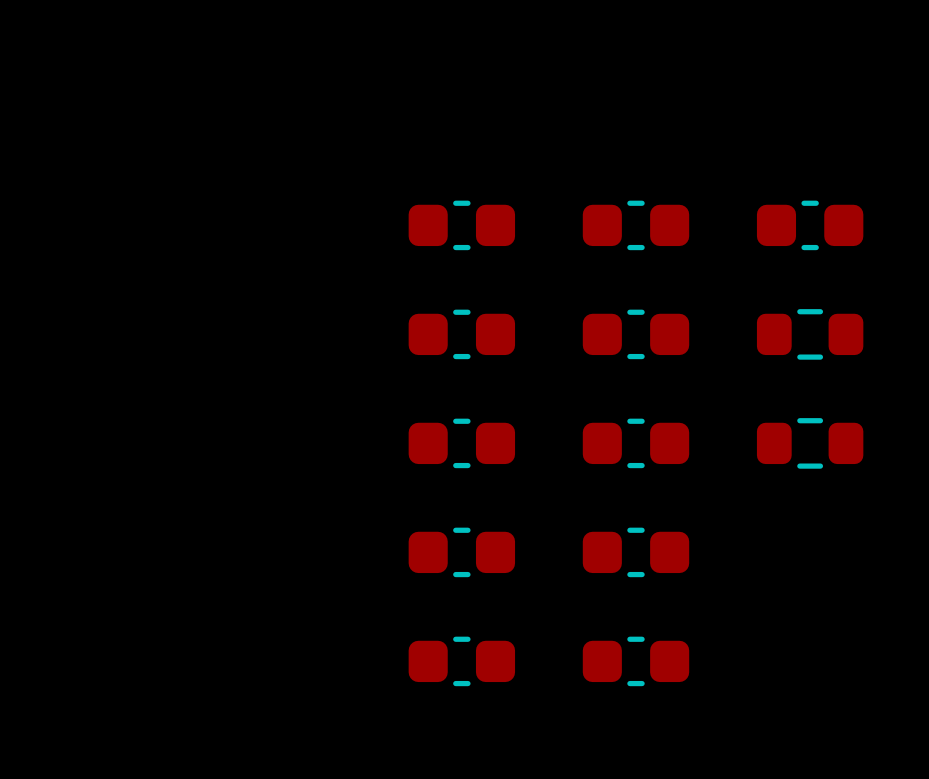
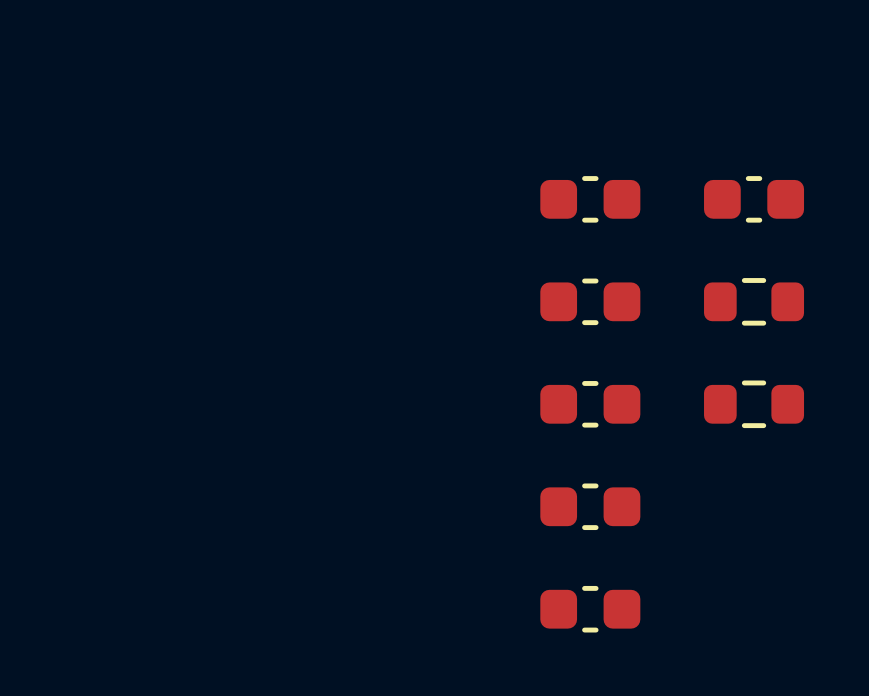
part: (461, 225) -> none
part: (461, 334) -> none
part: (461, 443) -> none
part: (461, 552) -> none
part: (461, 661) -> none

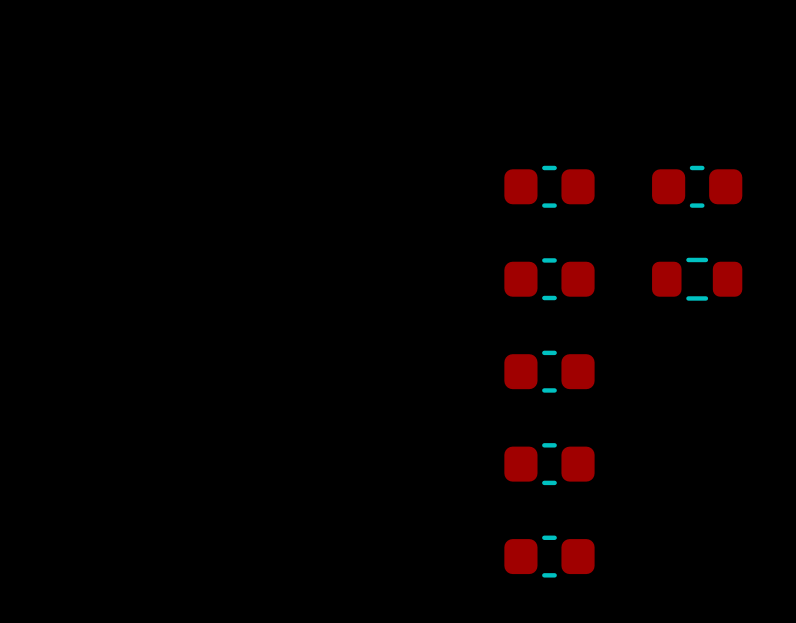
part: (754, 404) -> none

